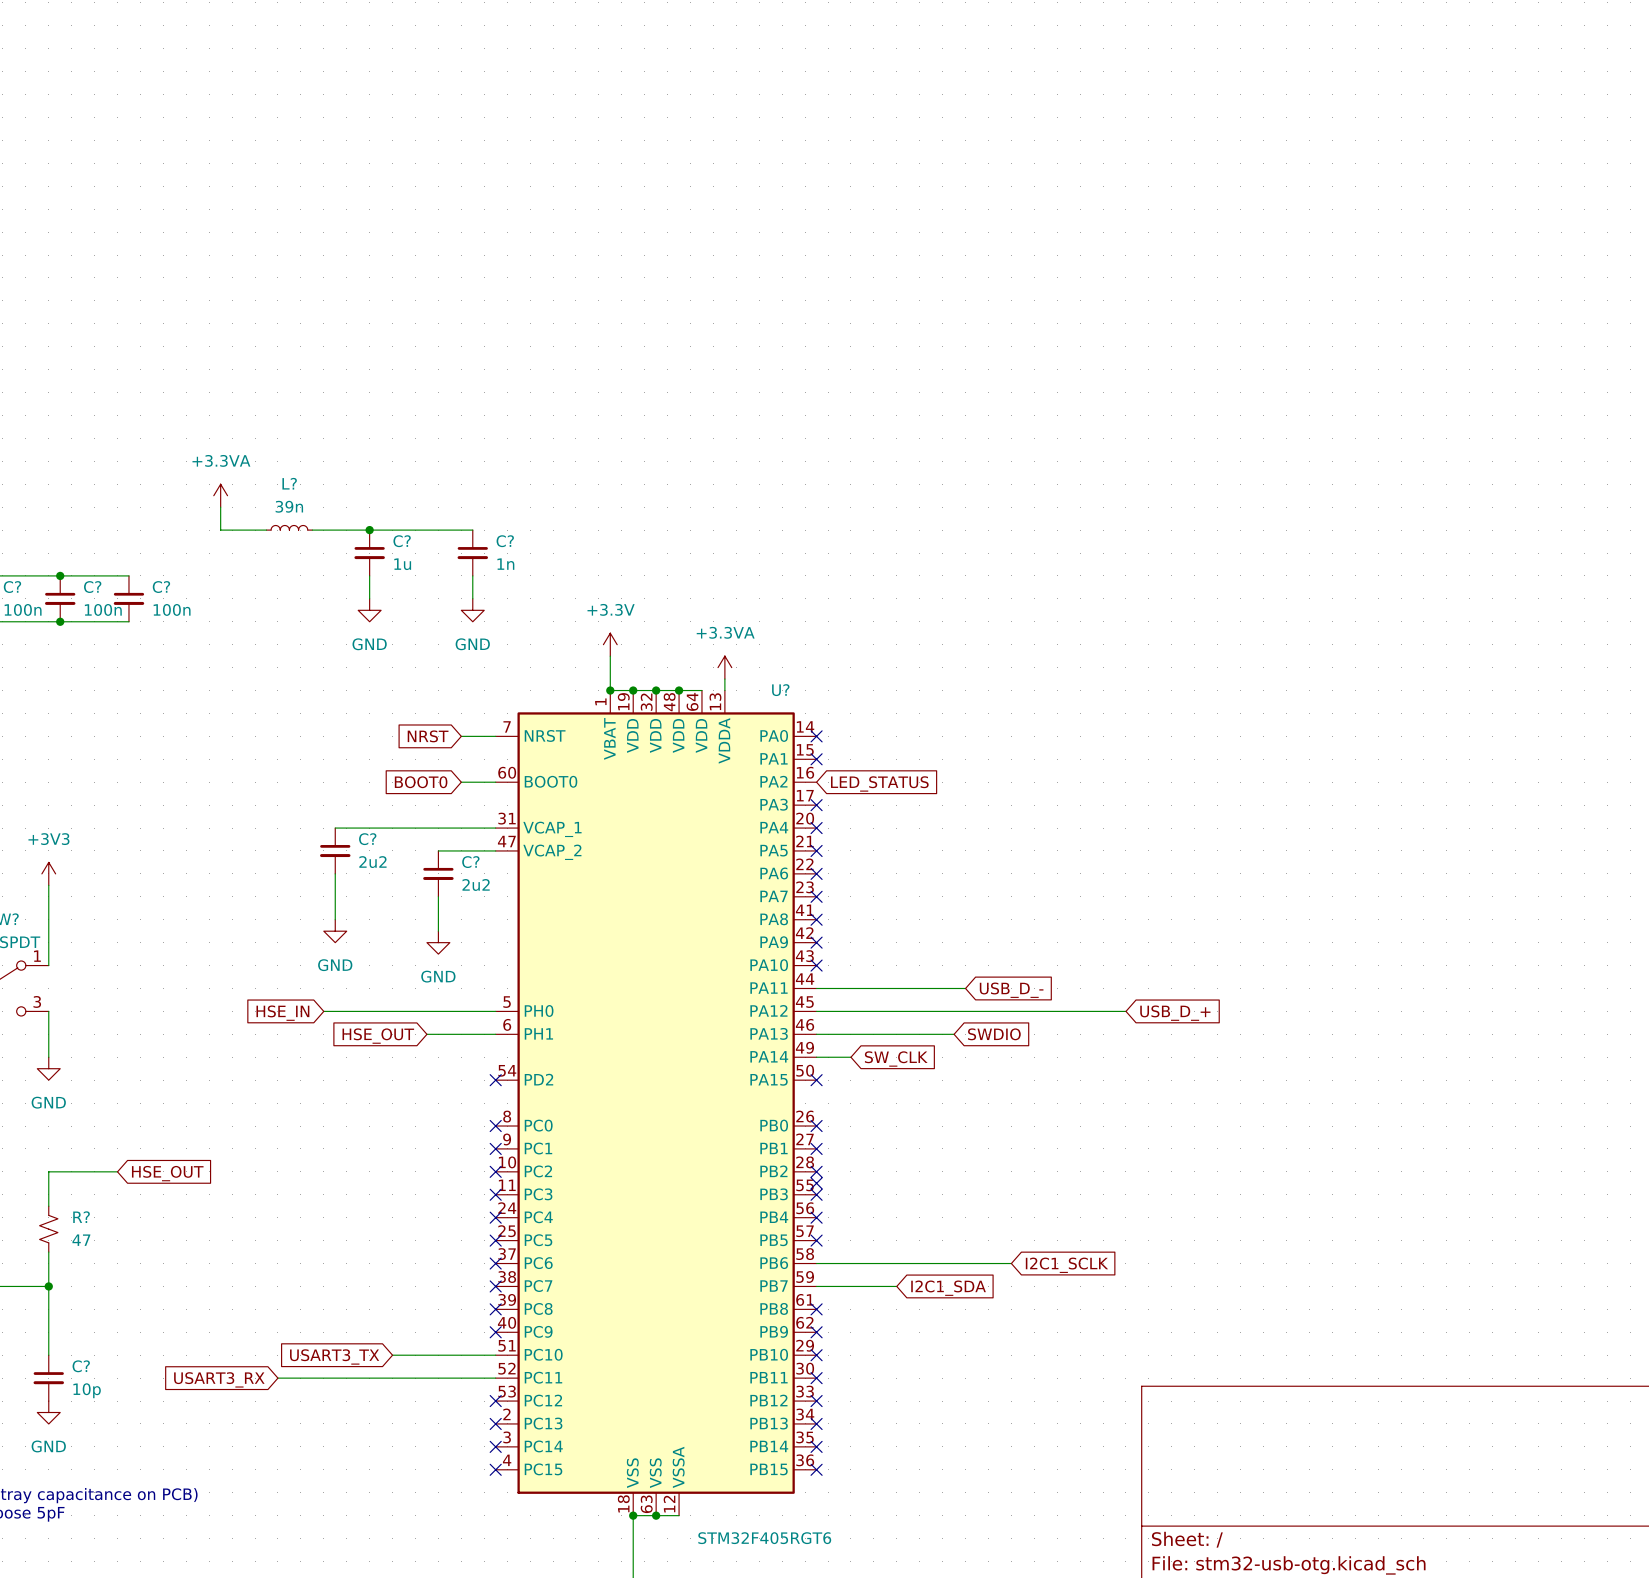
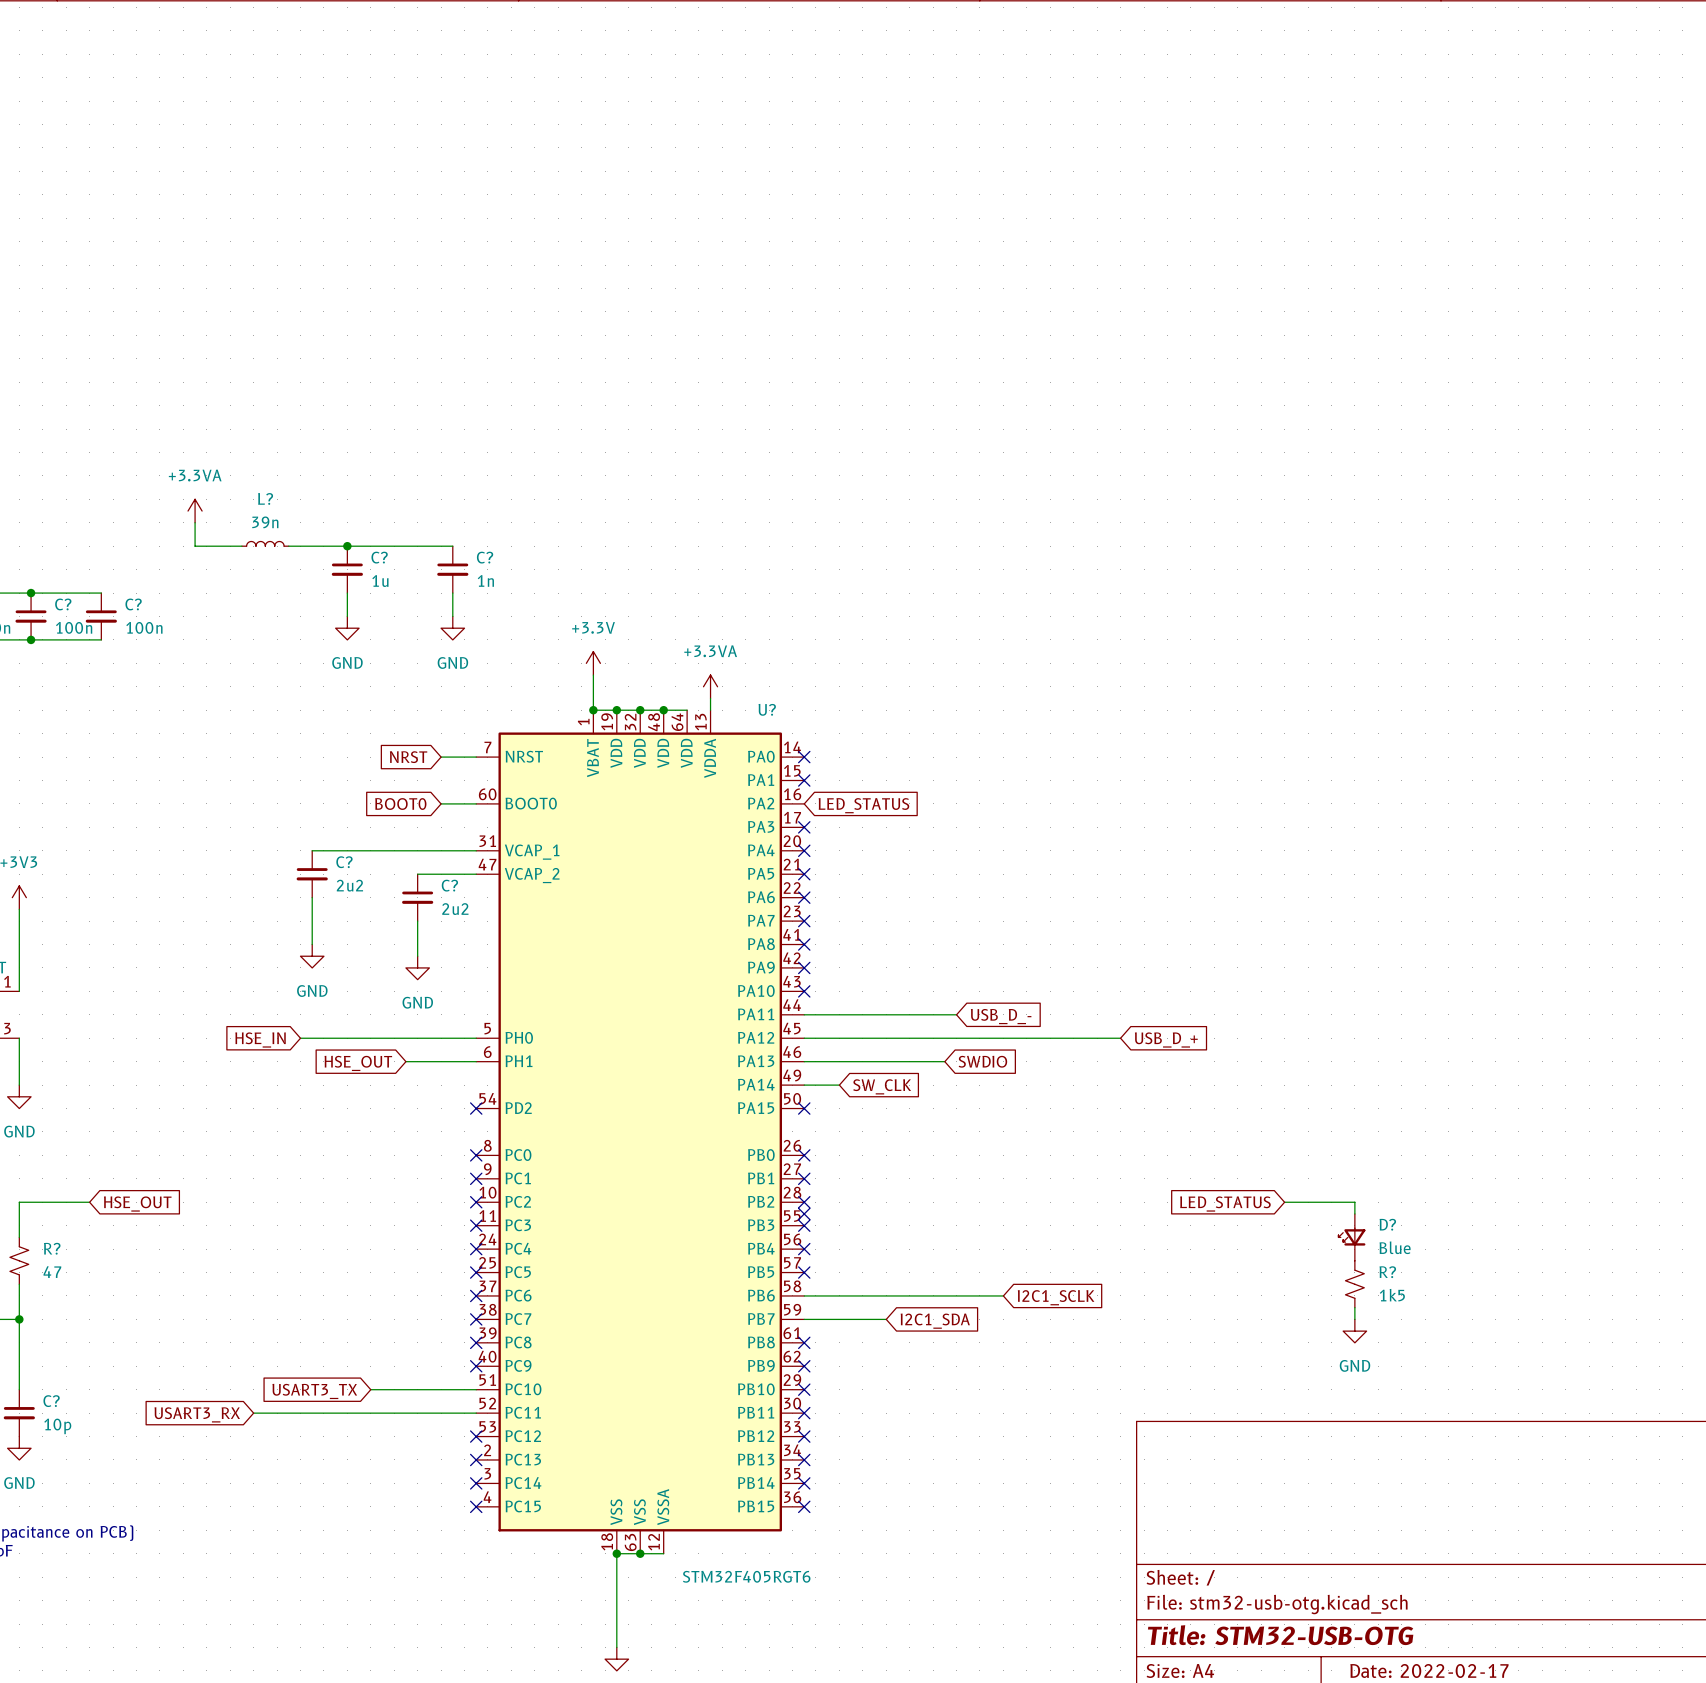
wire: none -> (1284, 1202) (1354, 1202) (1354, 1213)
global label: none -> LED_STATUS (1225, 1204)
D?: none -> Blue (1351, 1237)
R?: none -> 1k5 (1354, 1284)
wire: none -> (1354, 1307) (1354, 1319)
power symbol: none -> GND (1354, 1331)

